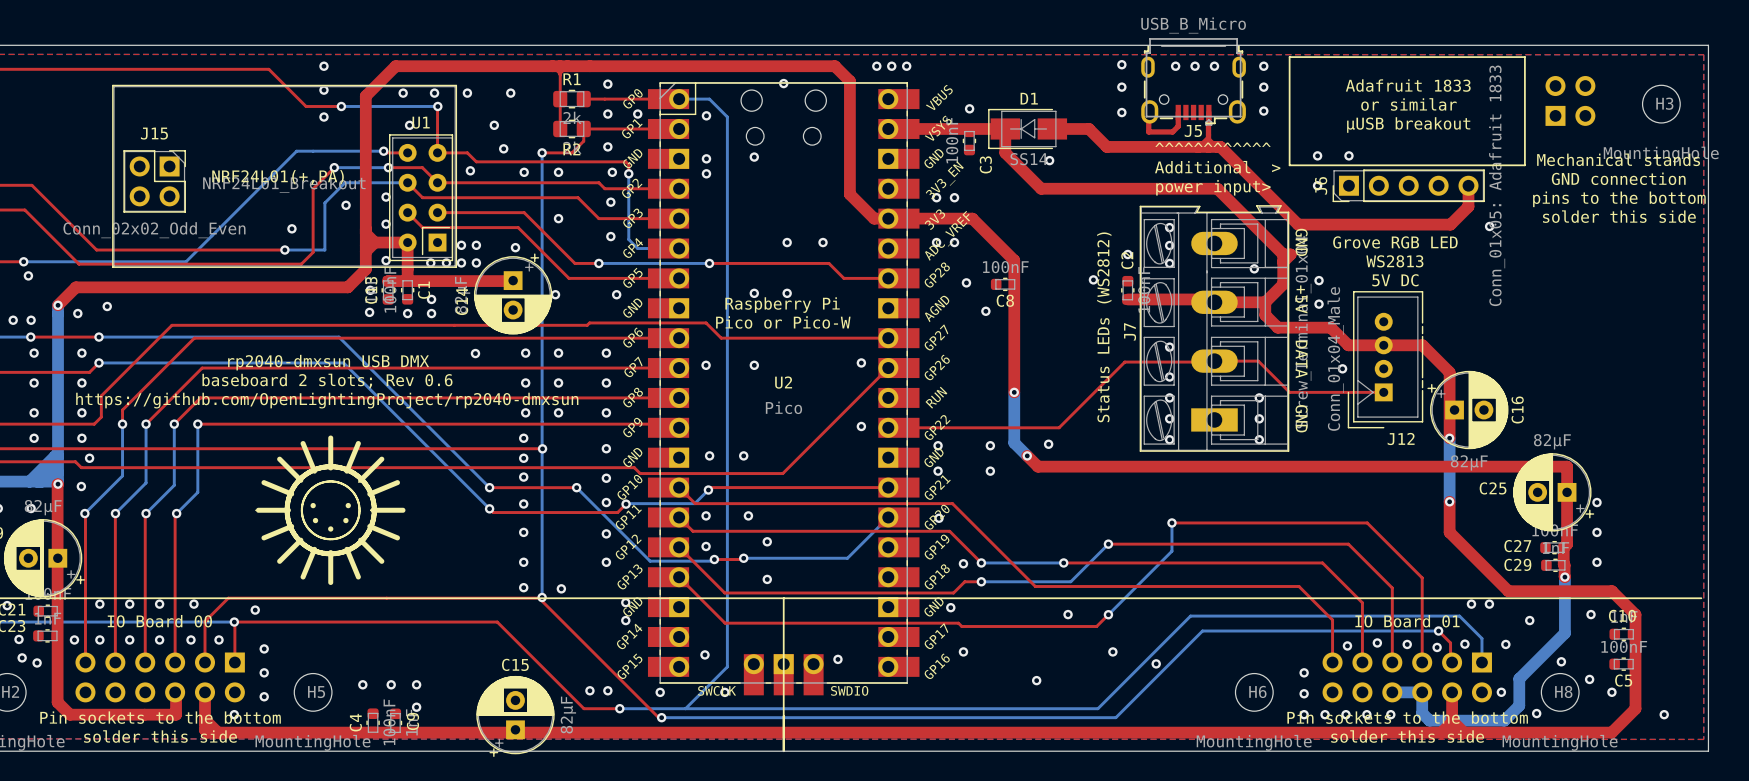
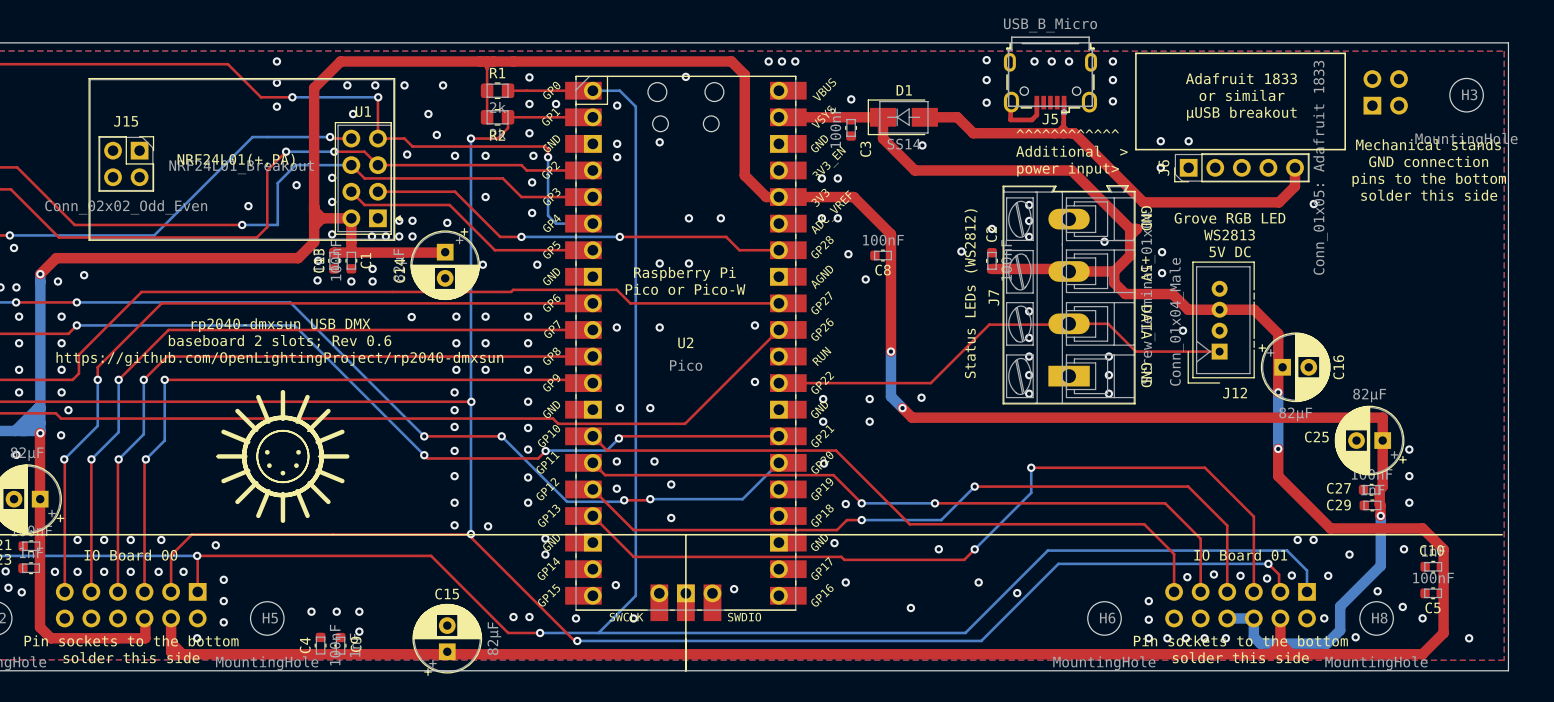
U1 footprint: [112, 84, 458, 268] -> [88, 77, 401, 241]

